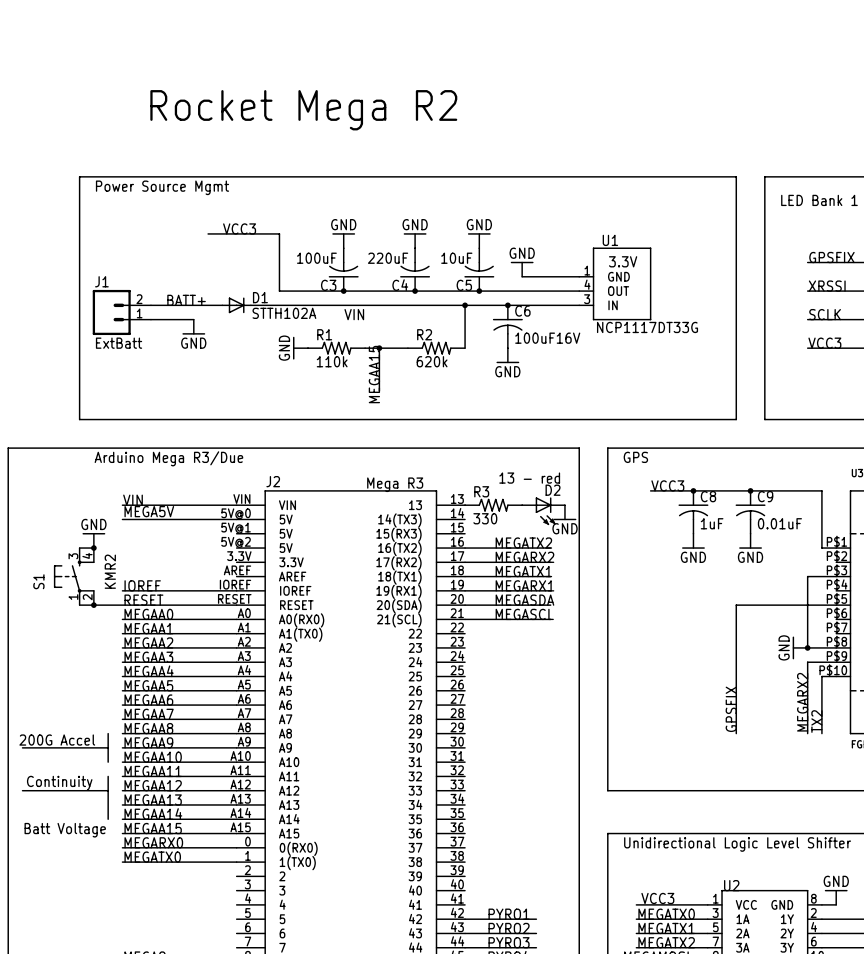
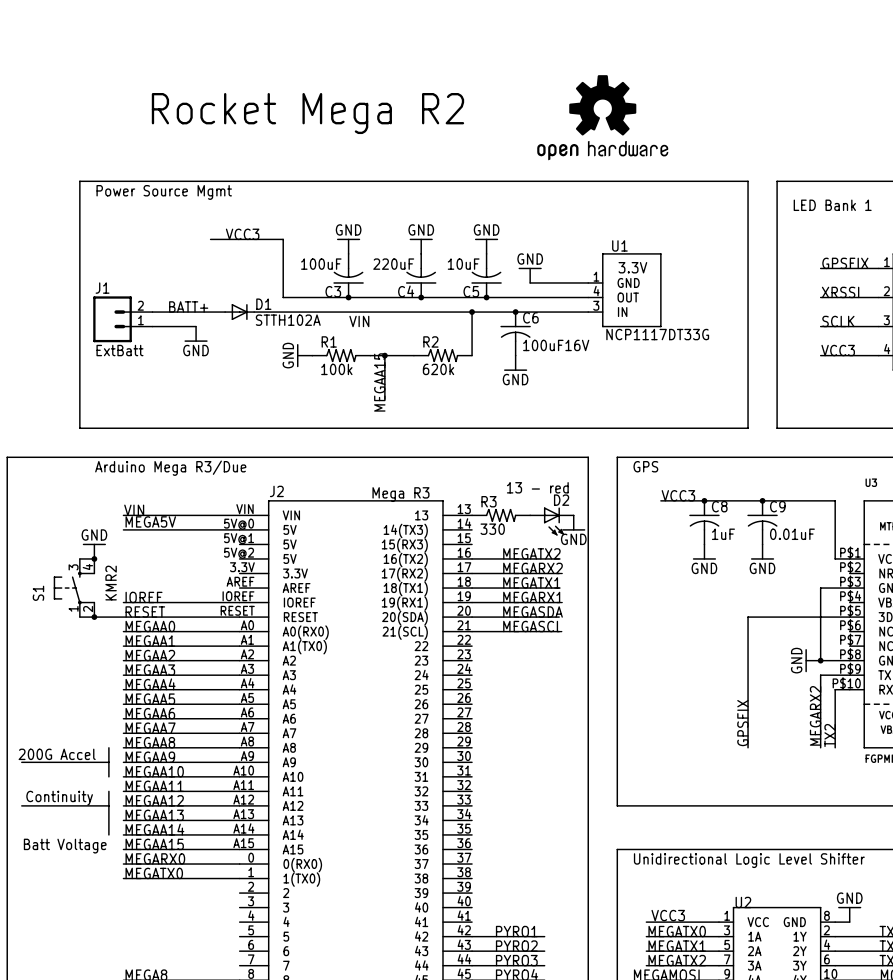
part: none -> (602, 117)
R1 value: 110k (332, 361) -> 100k (336, 369)

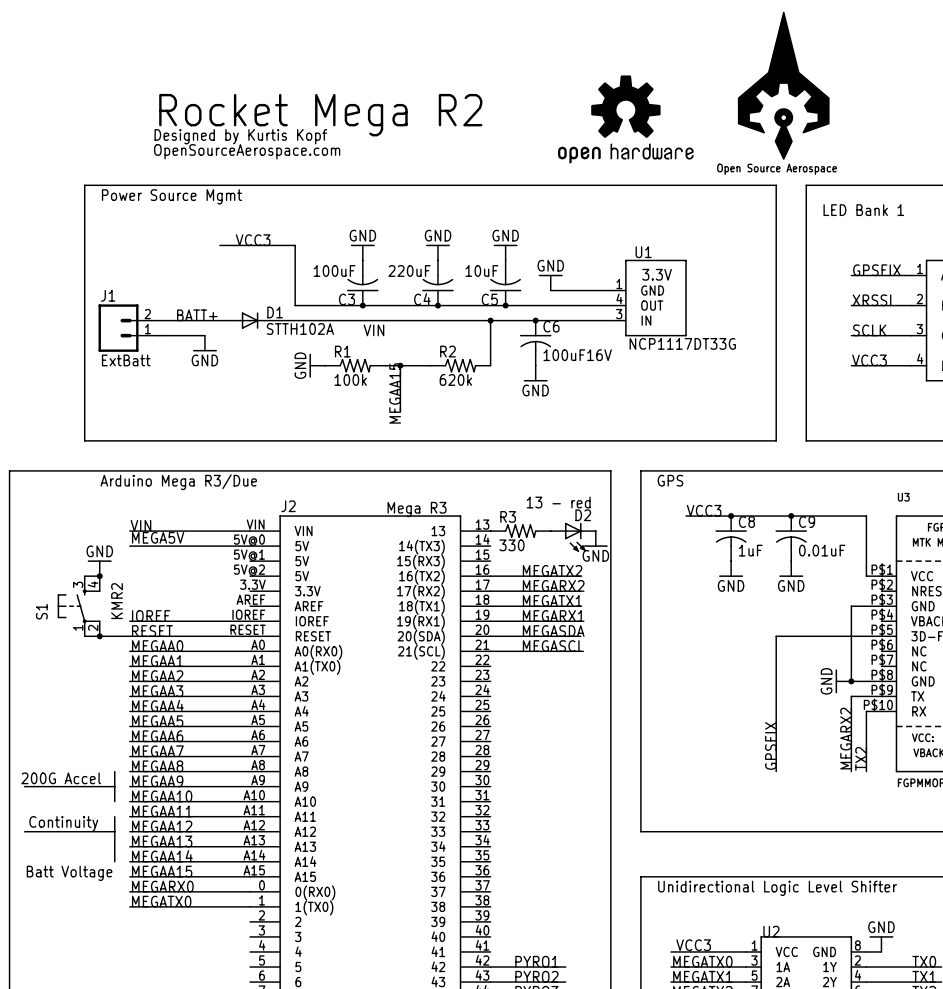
part: none -> (783, 85)
text: none -> Designed by Kurtis Kopf (240, 136)
text: none -> OpenSourceAerospace.com (247, 151)

